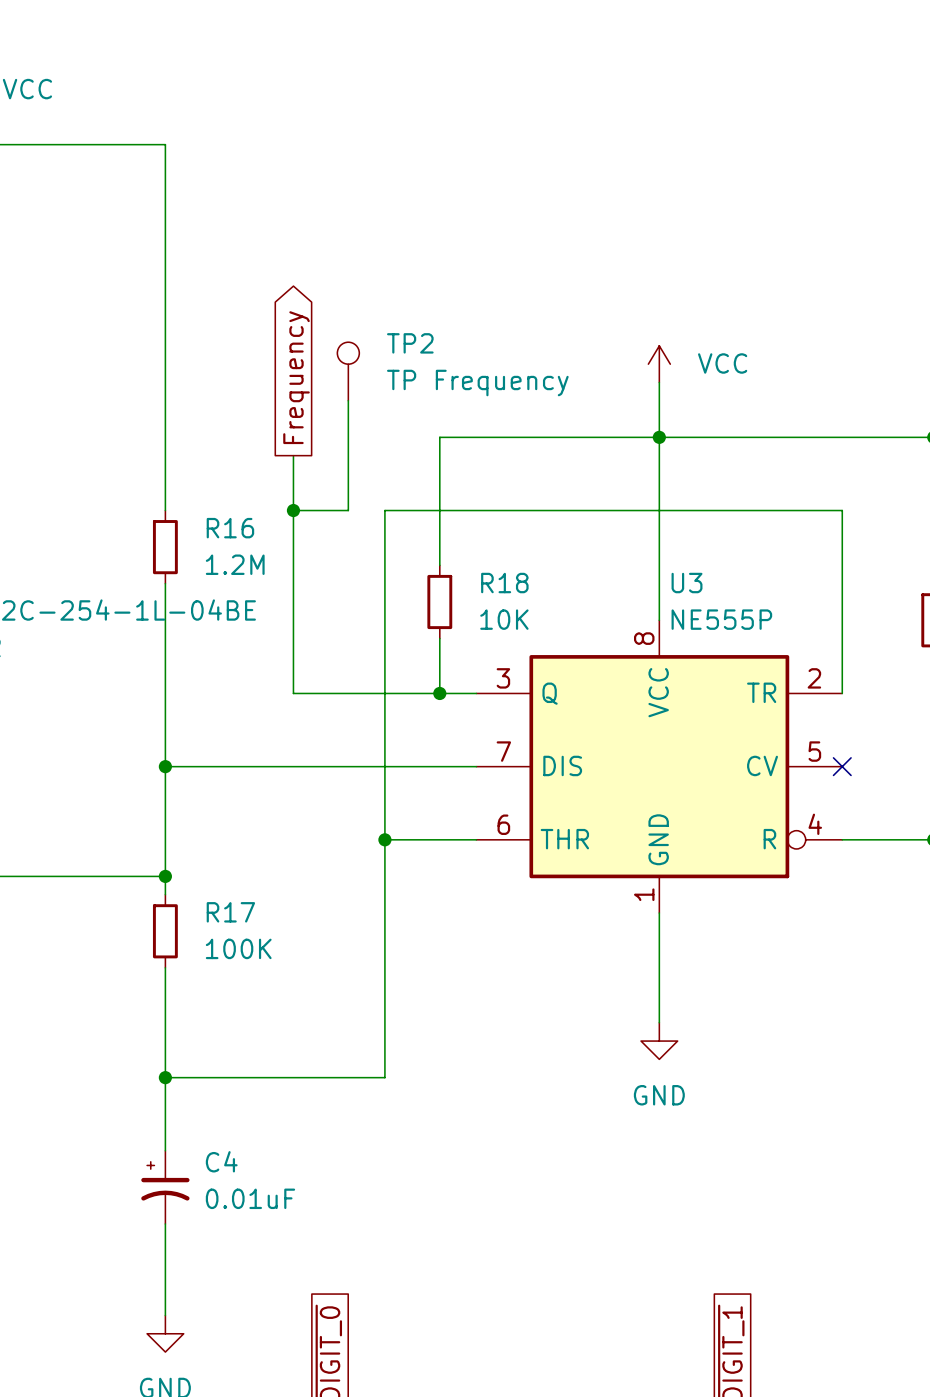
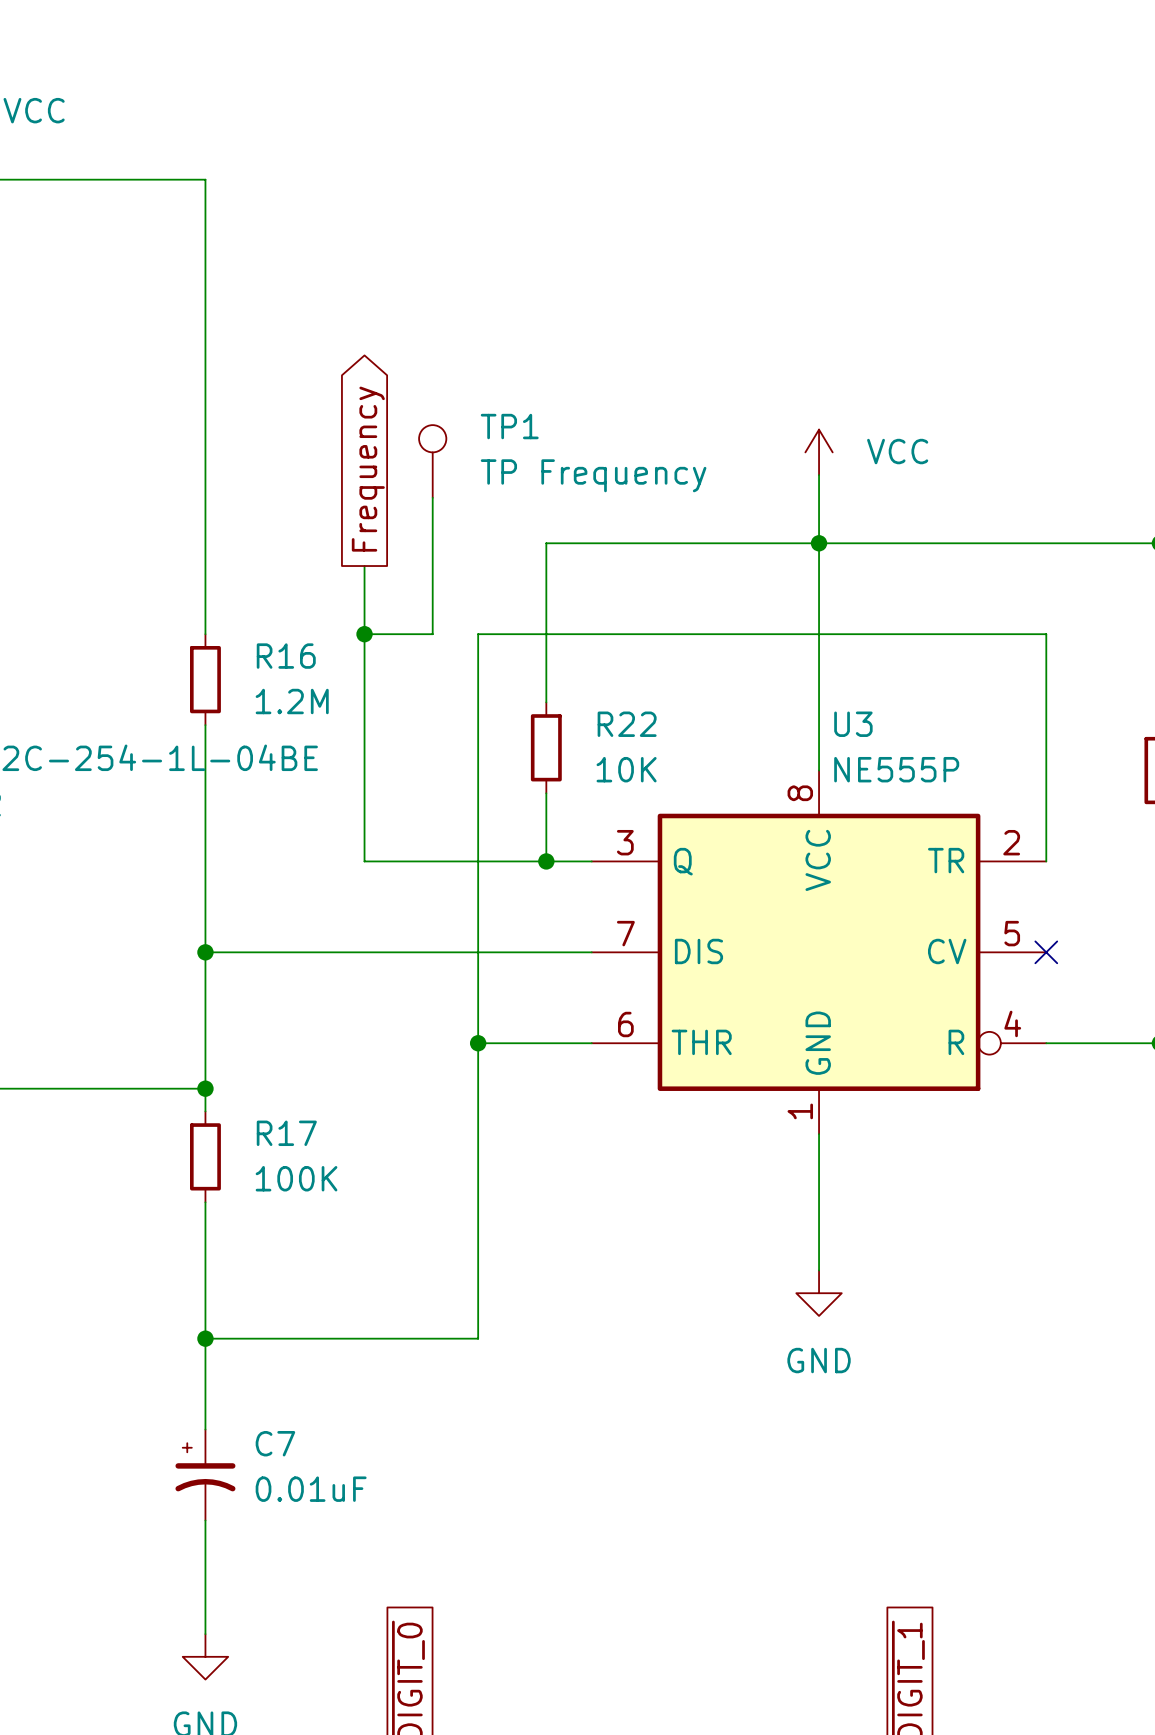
TP2 name: TP2 (410, 343) -> TP1 (509, 426)
R18 name: R18 (504, 583) -> R22 (627, 724)
C4 name: C4 (221, 1161) -> C7 (275, 1443)

